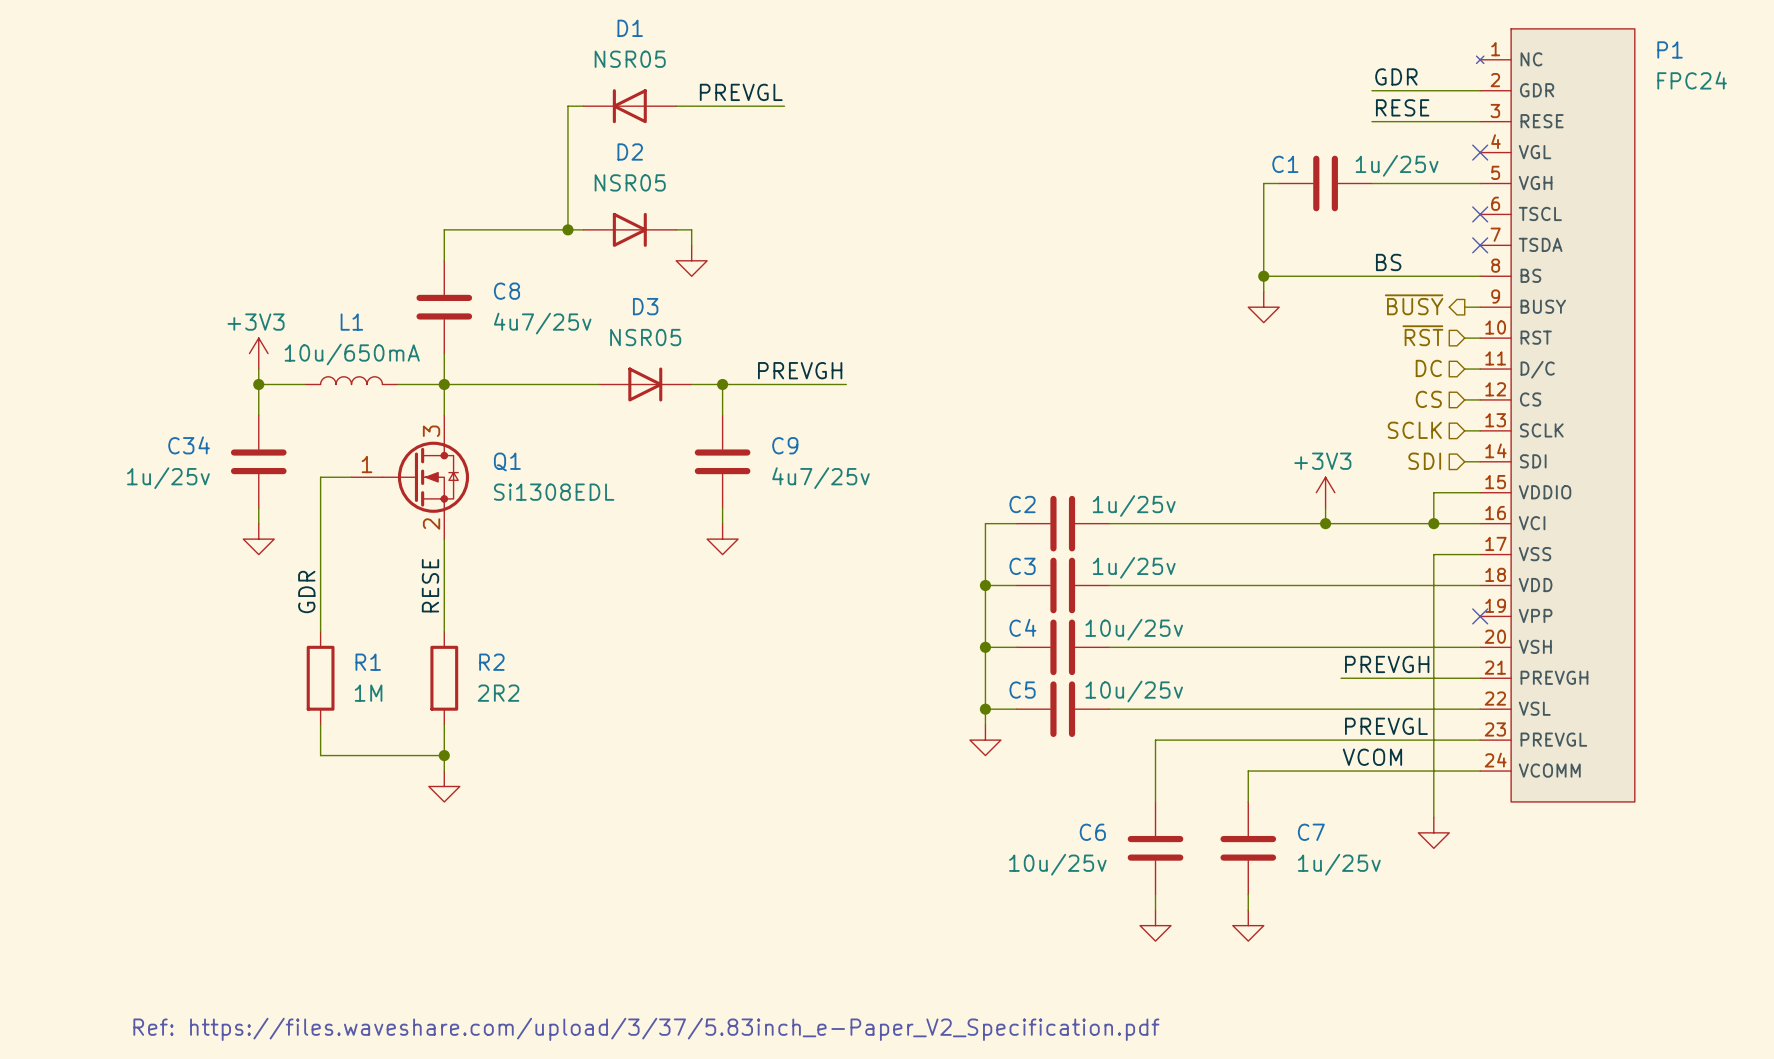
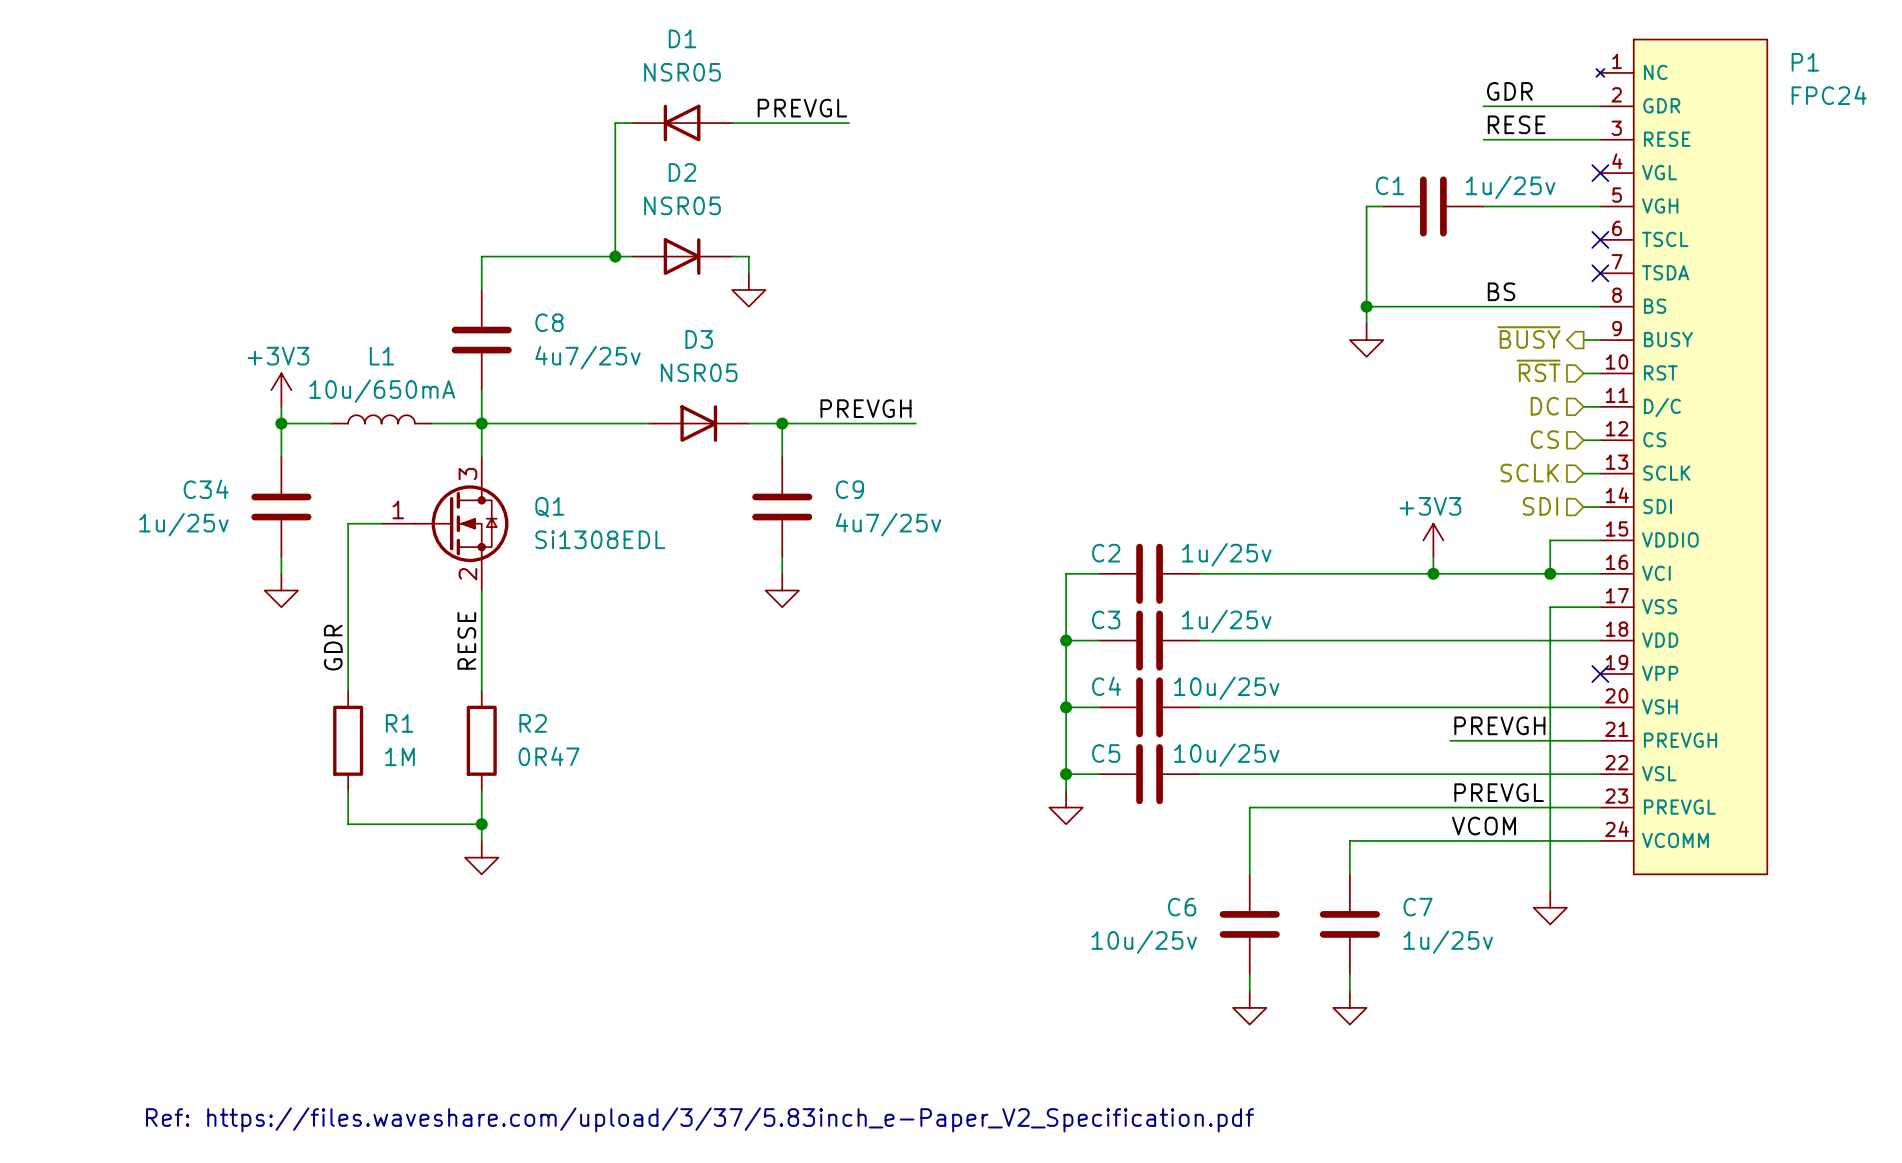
R2 value: 2R2 (498, 693) -> 0R47 (549, 756)

